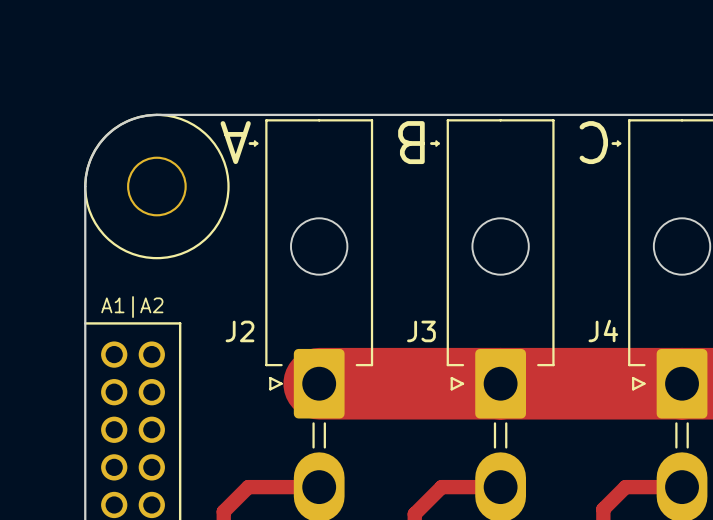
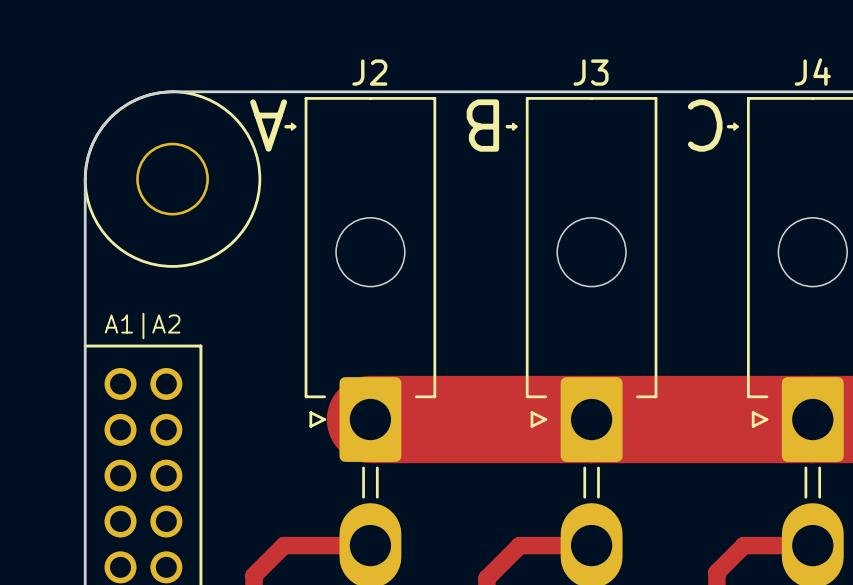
J2 name position: J2 (240, 331) -> J2 (369, 72)
J3 name position: J3 (421, 331) -> J3 (591, 72)
J4 name position: J4 (603, 331) -> J4 (812, 72)

